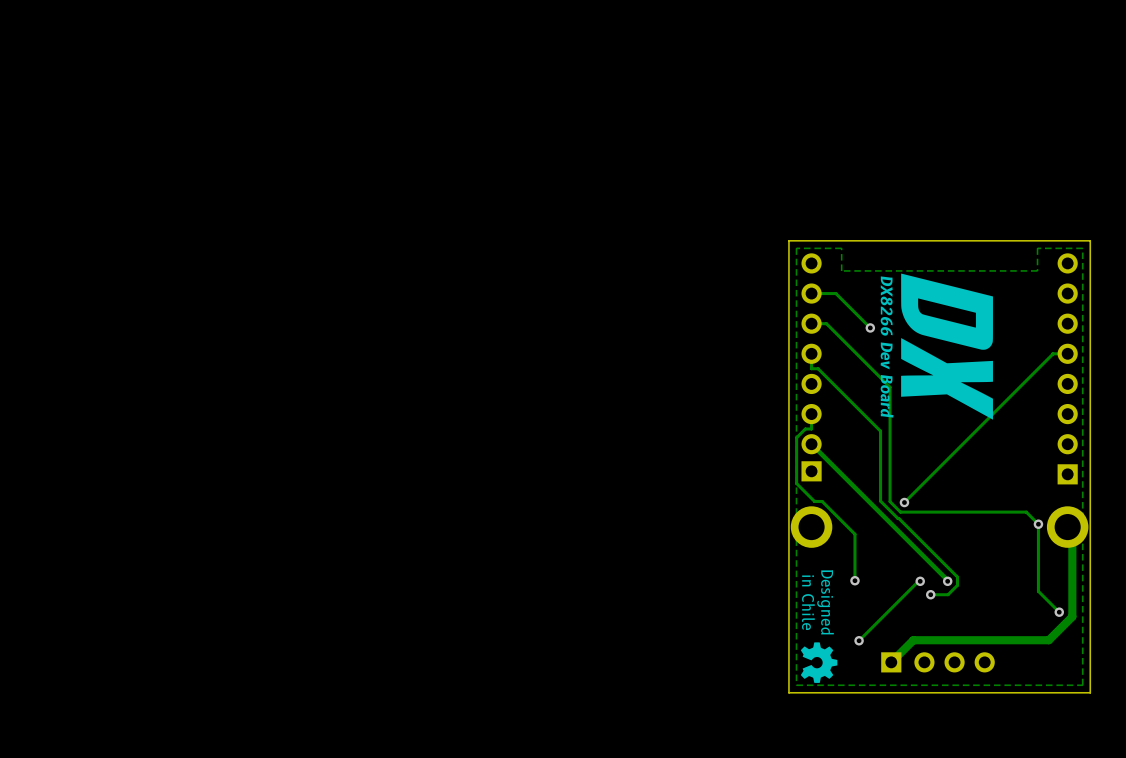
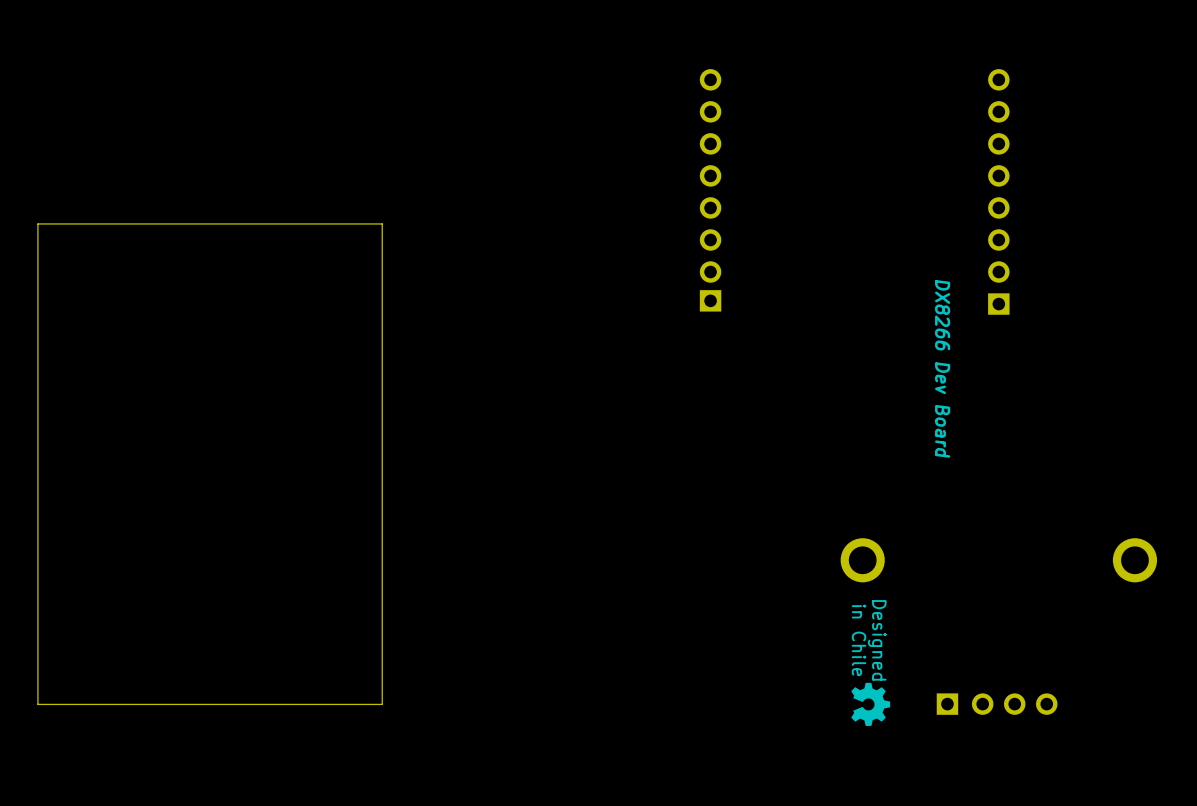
board edge: none -> (382, 223) (37, 223) (37, 704) (382, 704) (382, 223)
board edge: (1090, 240) (788, 240) (788, 692) (1090, 692) (1090, 240) -> none
zone outline: (1082, 248) (1037, 248) (1037, 270) (841, 270) (841, 248) (796, 248) (796, 685) (1082, 685) (1082, 248) -> none
drawing: [901, 273, 993, 420] -> none
track: (811, 293) (835, 293) (870, 327) -> none
track: (811, 323) (826, 323) (890, 387) (890, 501) (900, 512) (1026, 512) (1038, 524) (1038, 591) (1059, 612) -> none
via: (870, 327) -> none
track: (811, 353) (811, 368) (818, 368) (880, 431) (880, 501) (957, 577) (957, 585) (948, 594) (930, 594) -> none
track: (1067, 353) (1052, 353) (904, 502) -> none
part position: (811, 367) -> (710, 190)
part position: (1067, 368) -> (998, 191)
track: (811, 414) (811, 429) (805, 429) (796, 437) (796, 483) (814, 501) (822, 501) (854, 534) (854, 580) -> none
track: (811, 444) (947, 581) -> none
via: (904, 502) -> none
via: (1038, 524) -> none
track: (1067, 527) (1072, 531) (1072, 616) (1048, 640) (913, 640) (891, 662) -> none
via: (854, 580) -> none
track: (920, 581) (859, 640) -> none
via: (920, 581) -> none
via: (947, 581) -> none
via: (930, 594) -> none
via: (1059, 612) -> none
via: (859, 640) -> none

